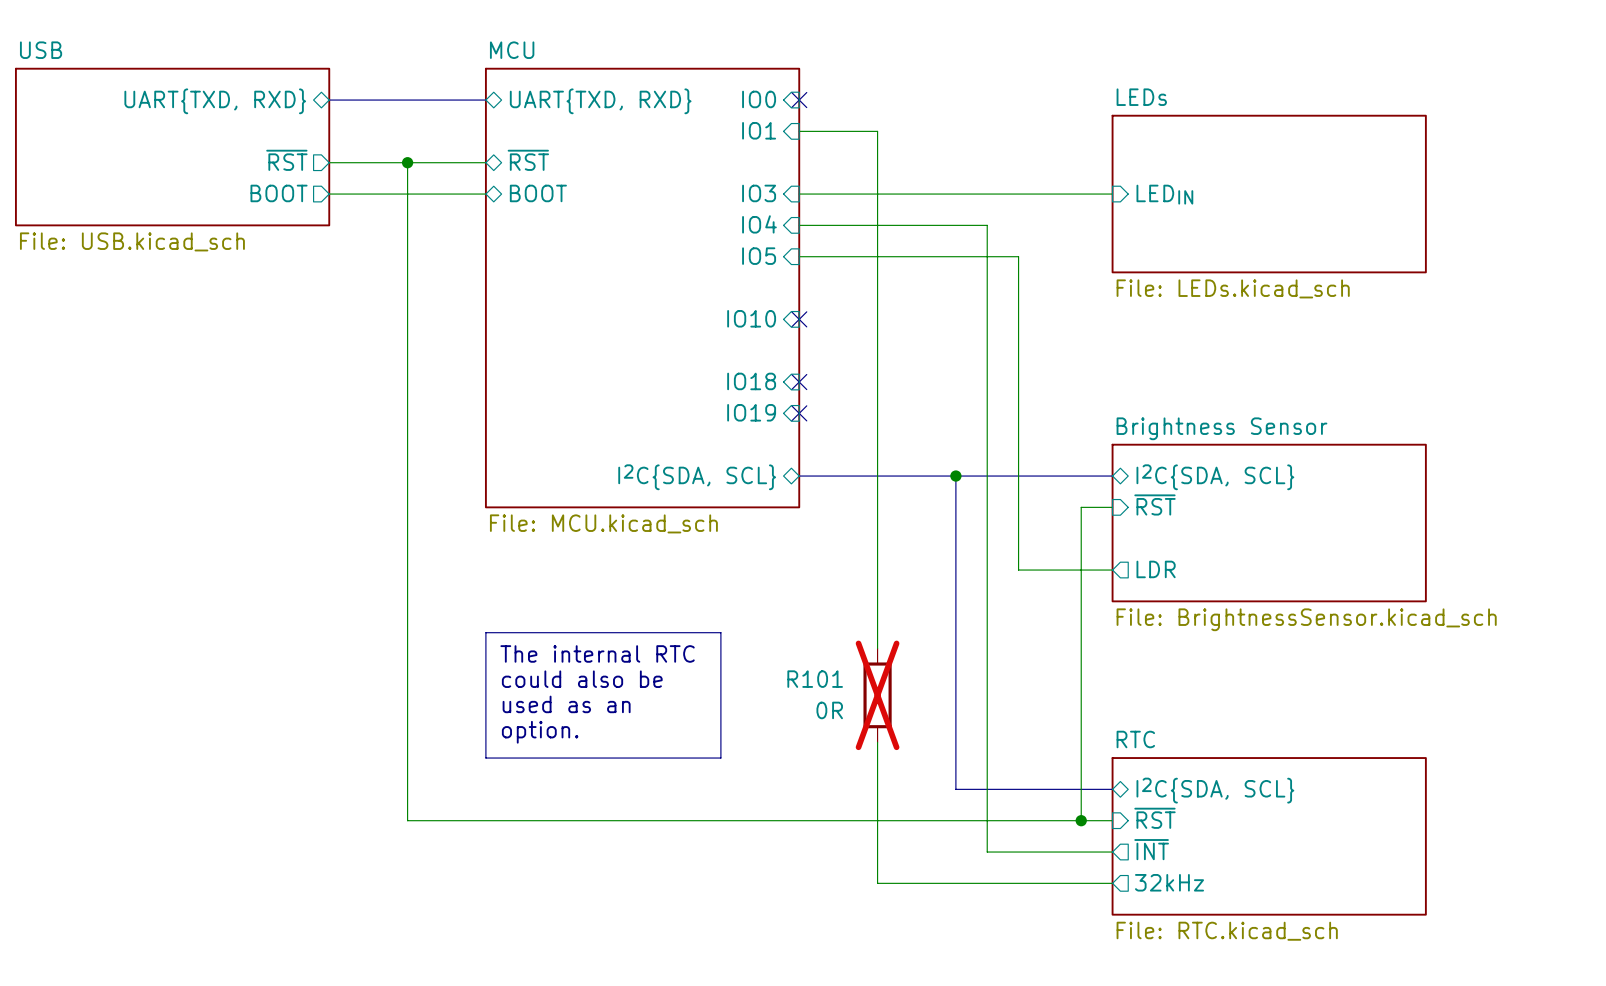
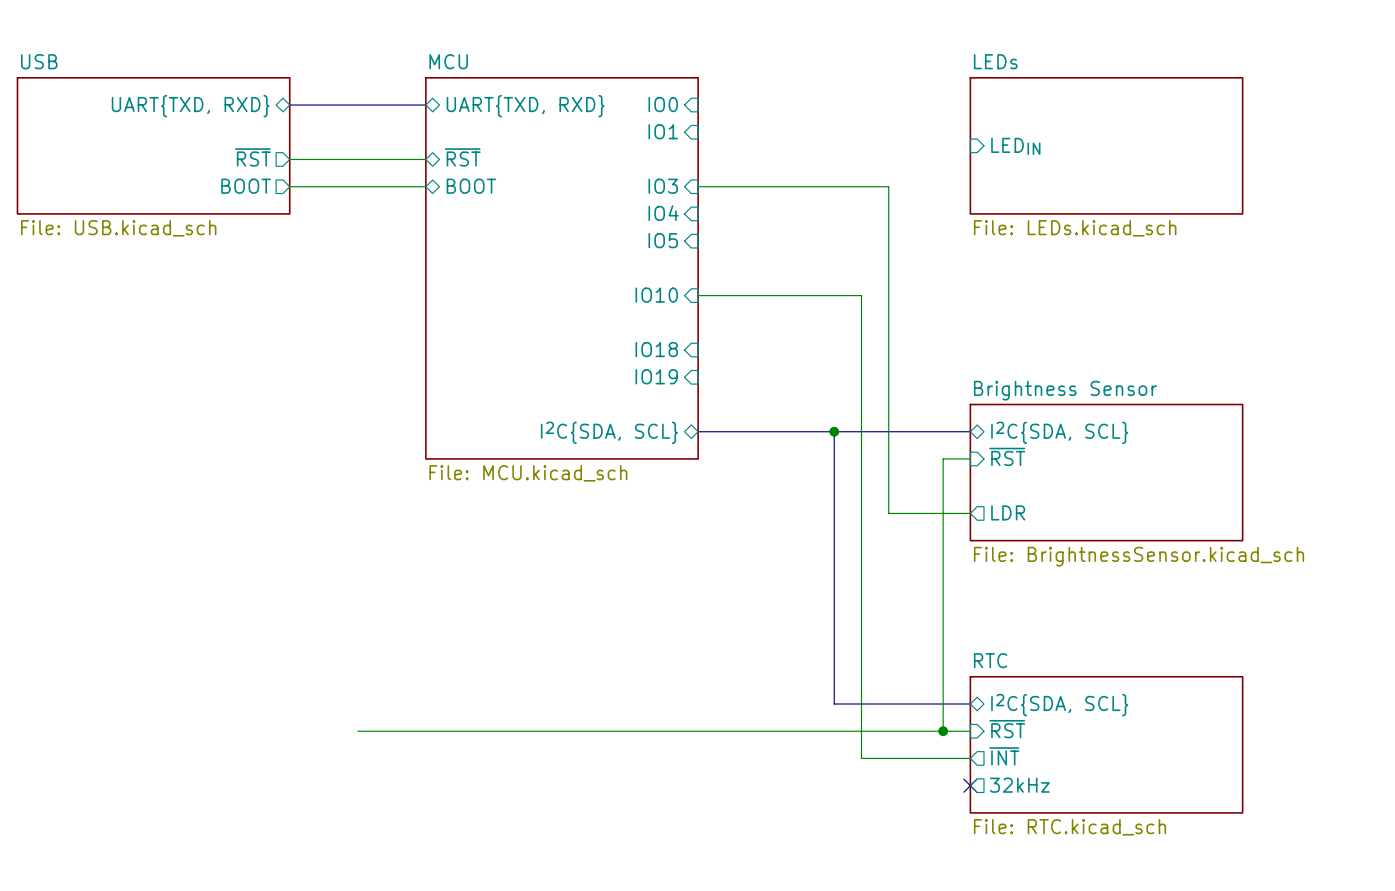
no-connect mark: (799, 100) -> none
wire: (799, 131) (877, 131) (877, 648) -> none
wire: (407, 162) (407, 820) -> none
junction: (407, 162) -> none
wire: (1018, 194) (1112, 194) -> (888, 186) (888, 241)
sheet pin position: LEDIN (1164, 194) -> LEDIN (1015, 146)
sheet LEDs position: (1269, 194) -> (1106, 145)
wire: (799, 225) (987, 225) (987, 319) -> (698, 295) (861, 295)
wire: (799, 256) (1018, 256) -> none
no-connect mark: (799, 319) -> none
no-connect mark: (799, 382) -> none
no-connect mark: (799, 413) -> none
line: (485, 632) (720, 632) (720, 758) (485, 758) (485, 632) -> none
text: The internal RTC (597, 653) -> none
text: could also be (582, 679) -> none
R101: 0R (877, 695) -> none
text: used as an (566, 704) -> none
text: option. (540, 732) -> none
wire: (877, 742) (877, 883) (1112, 883) -> none
no-connect mark: none -> (970, 785)

